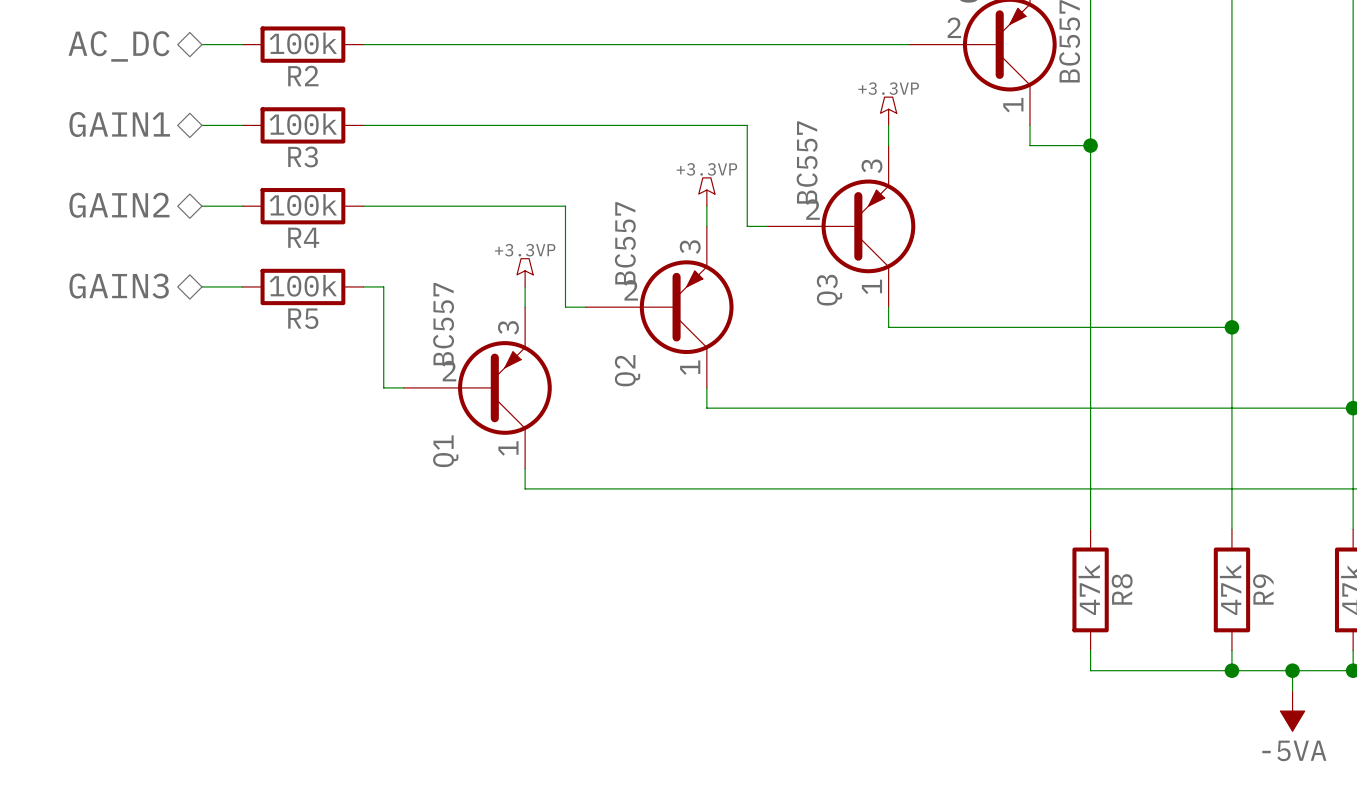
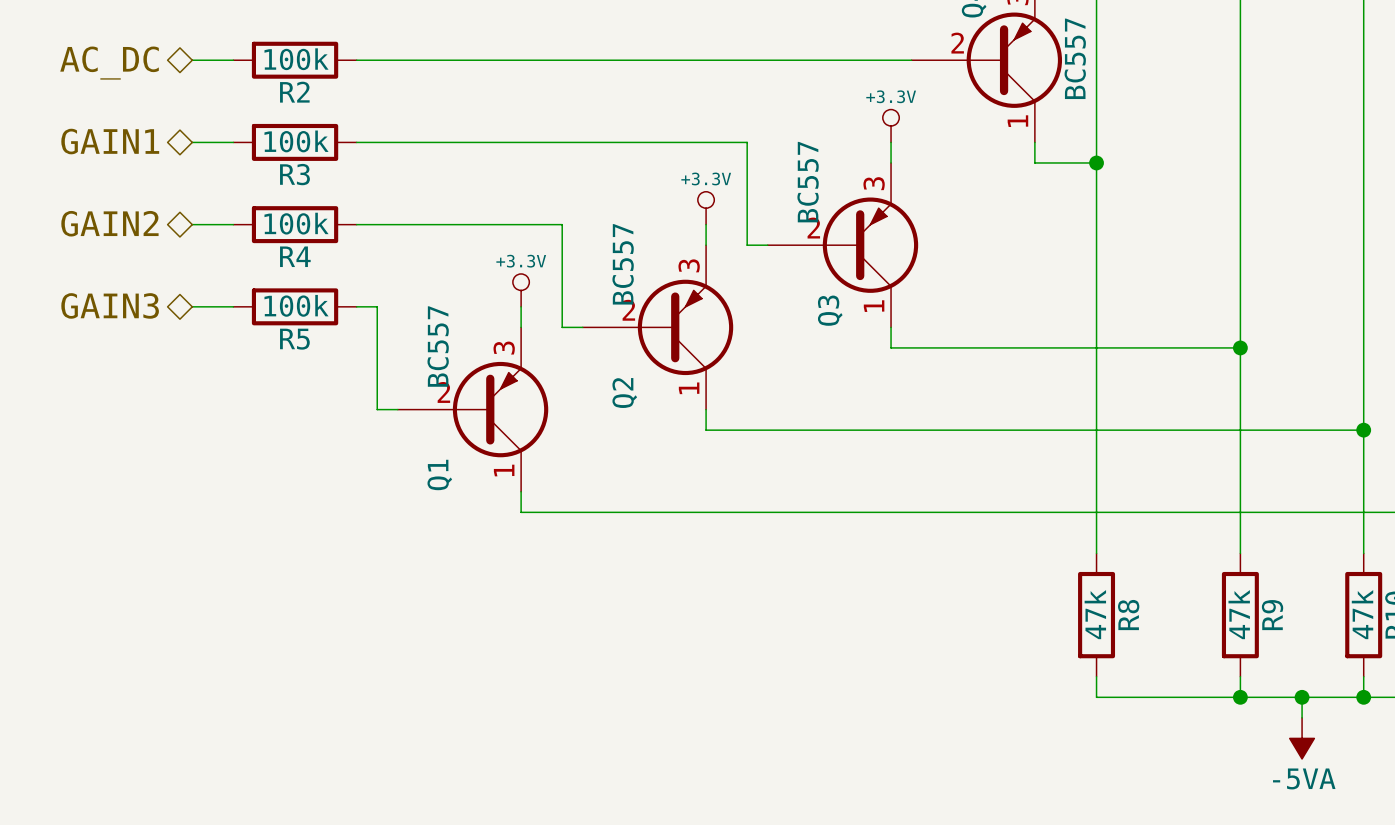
power symbol: +3.3VP (888, 111) -> +3.3V (891, 125)
power symbol: +3.3VP (706, 192) -> +3.3V (706, 208)
power symbol: +3.3VP (525, 272) -> +3.3V (521, 290)

